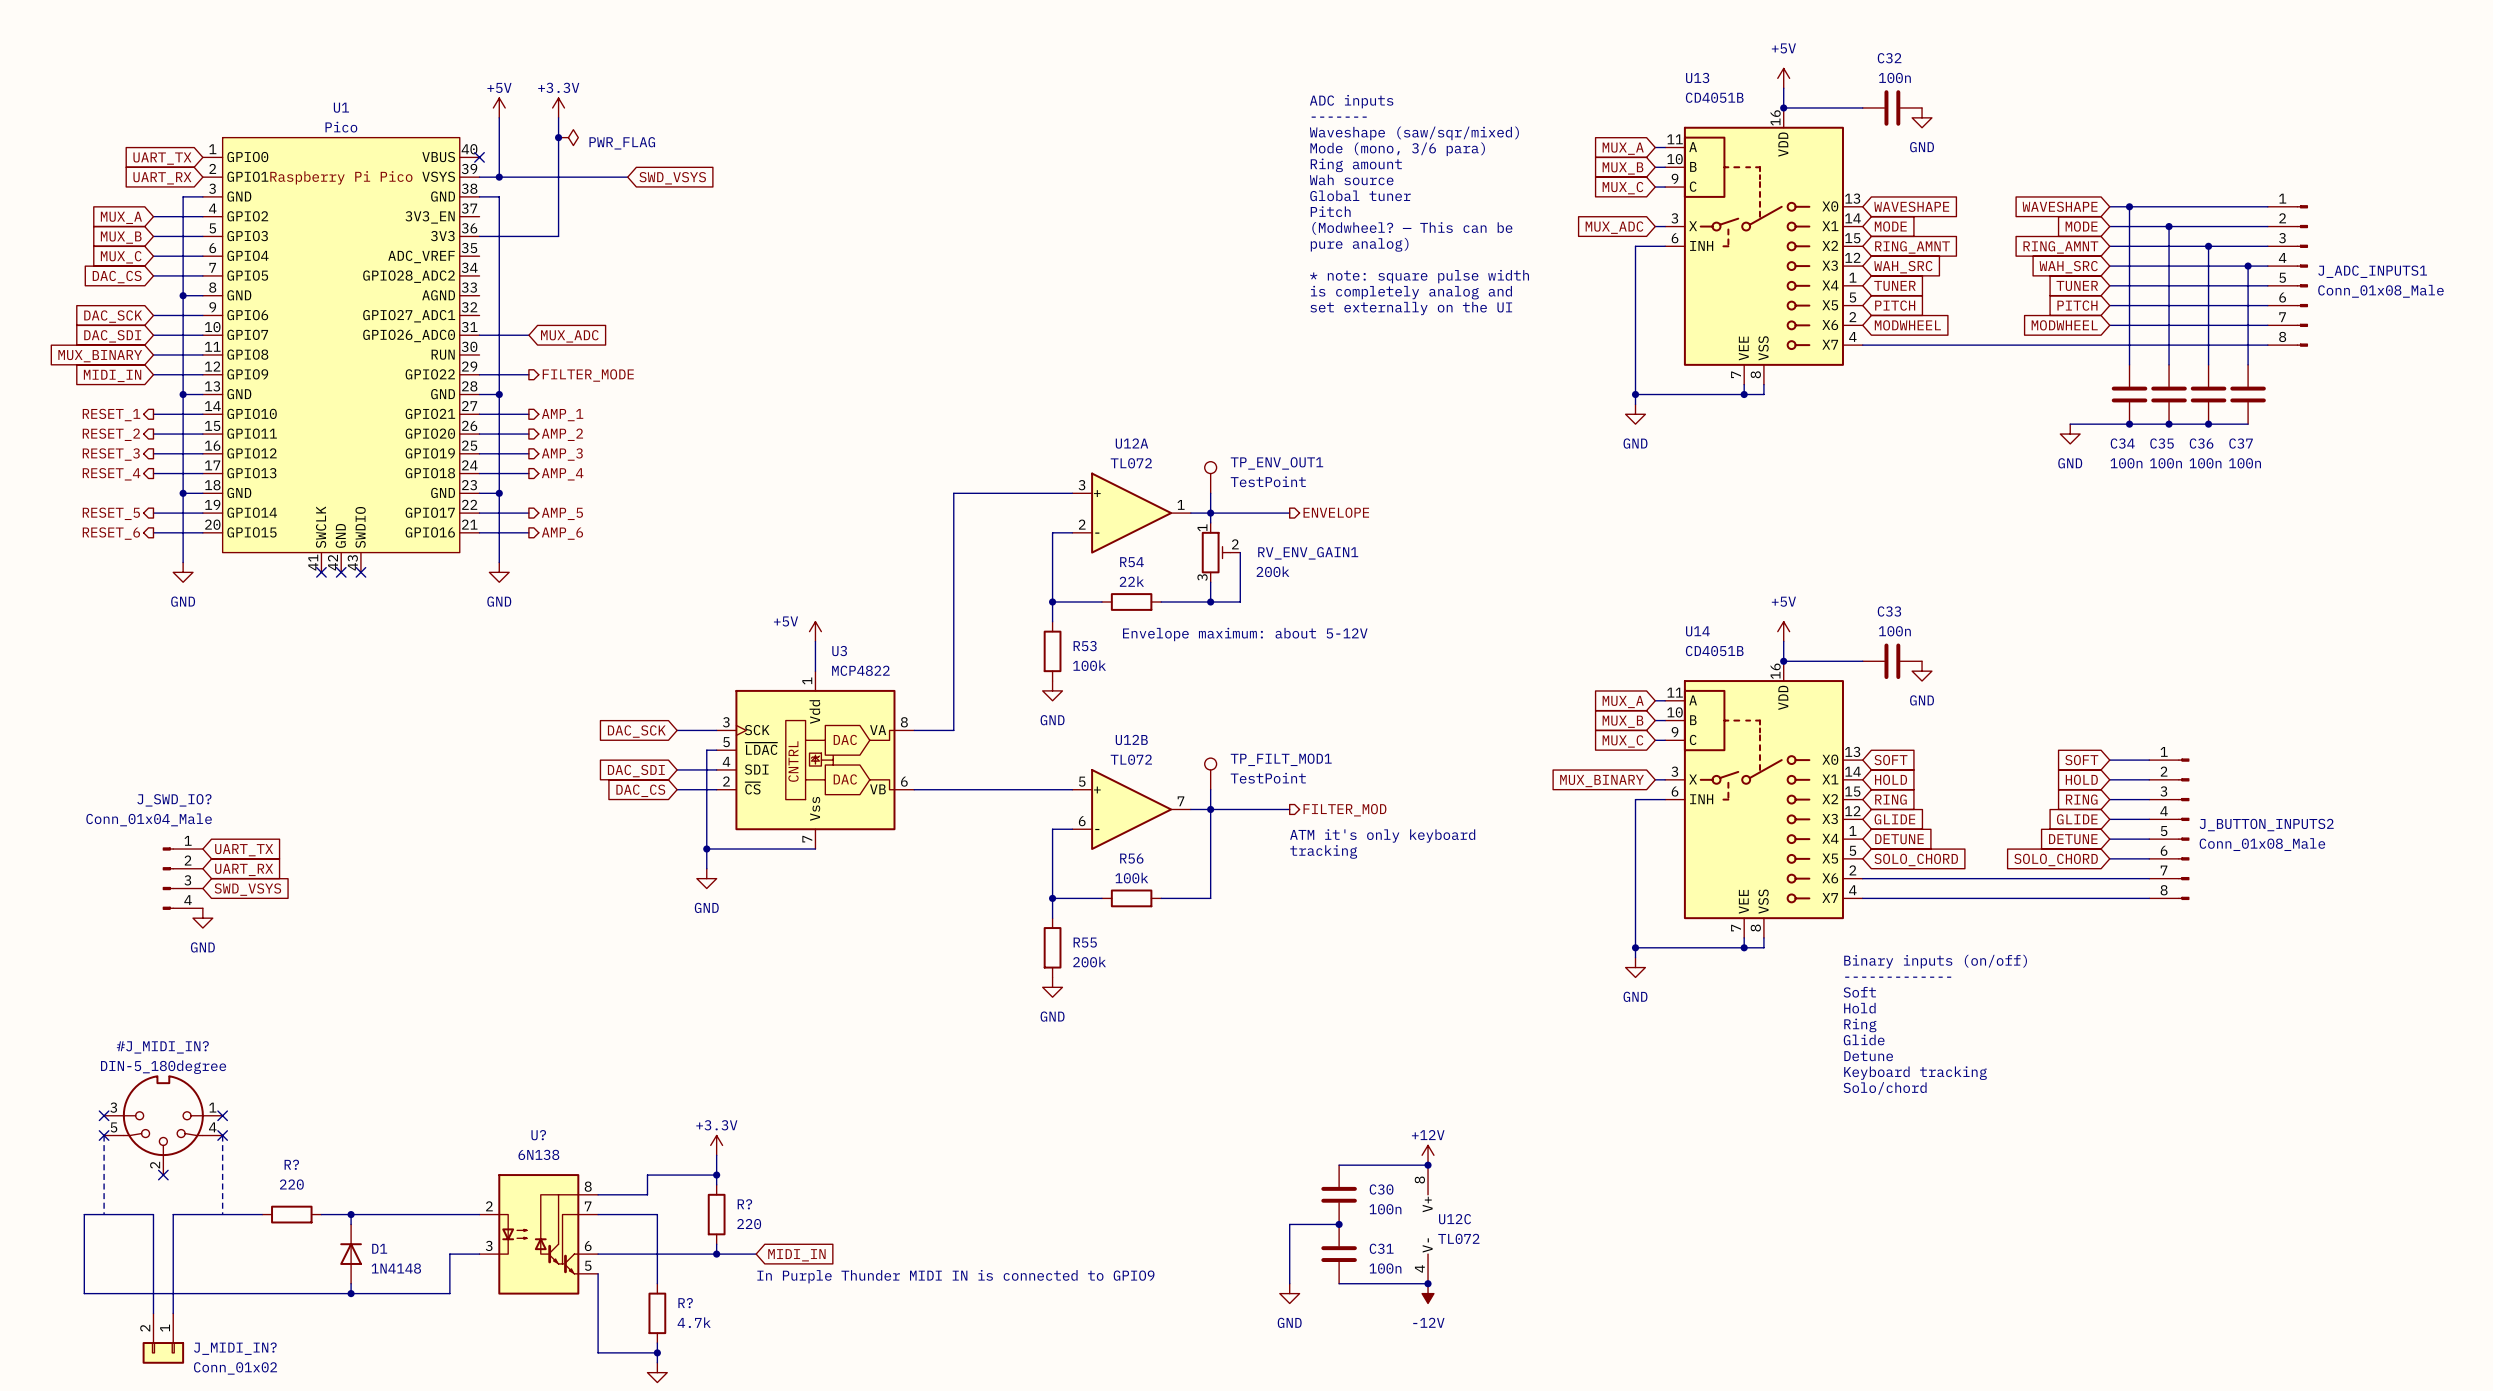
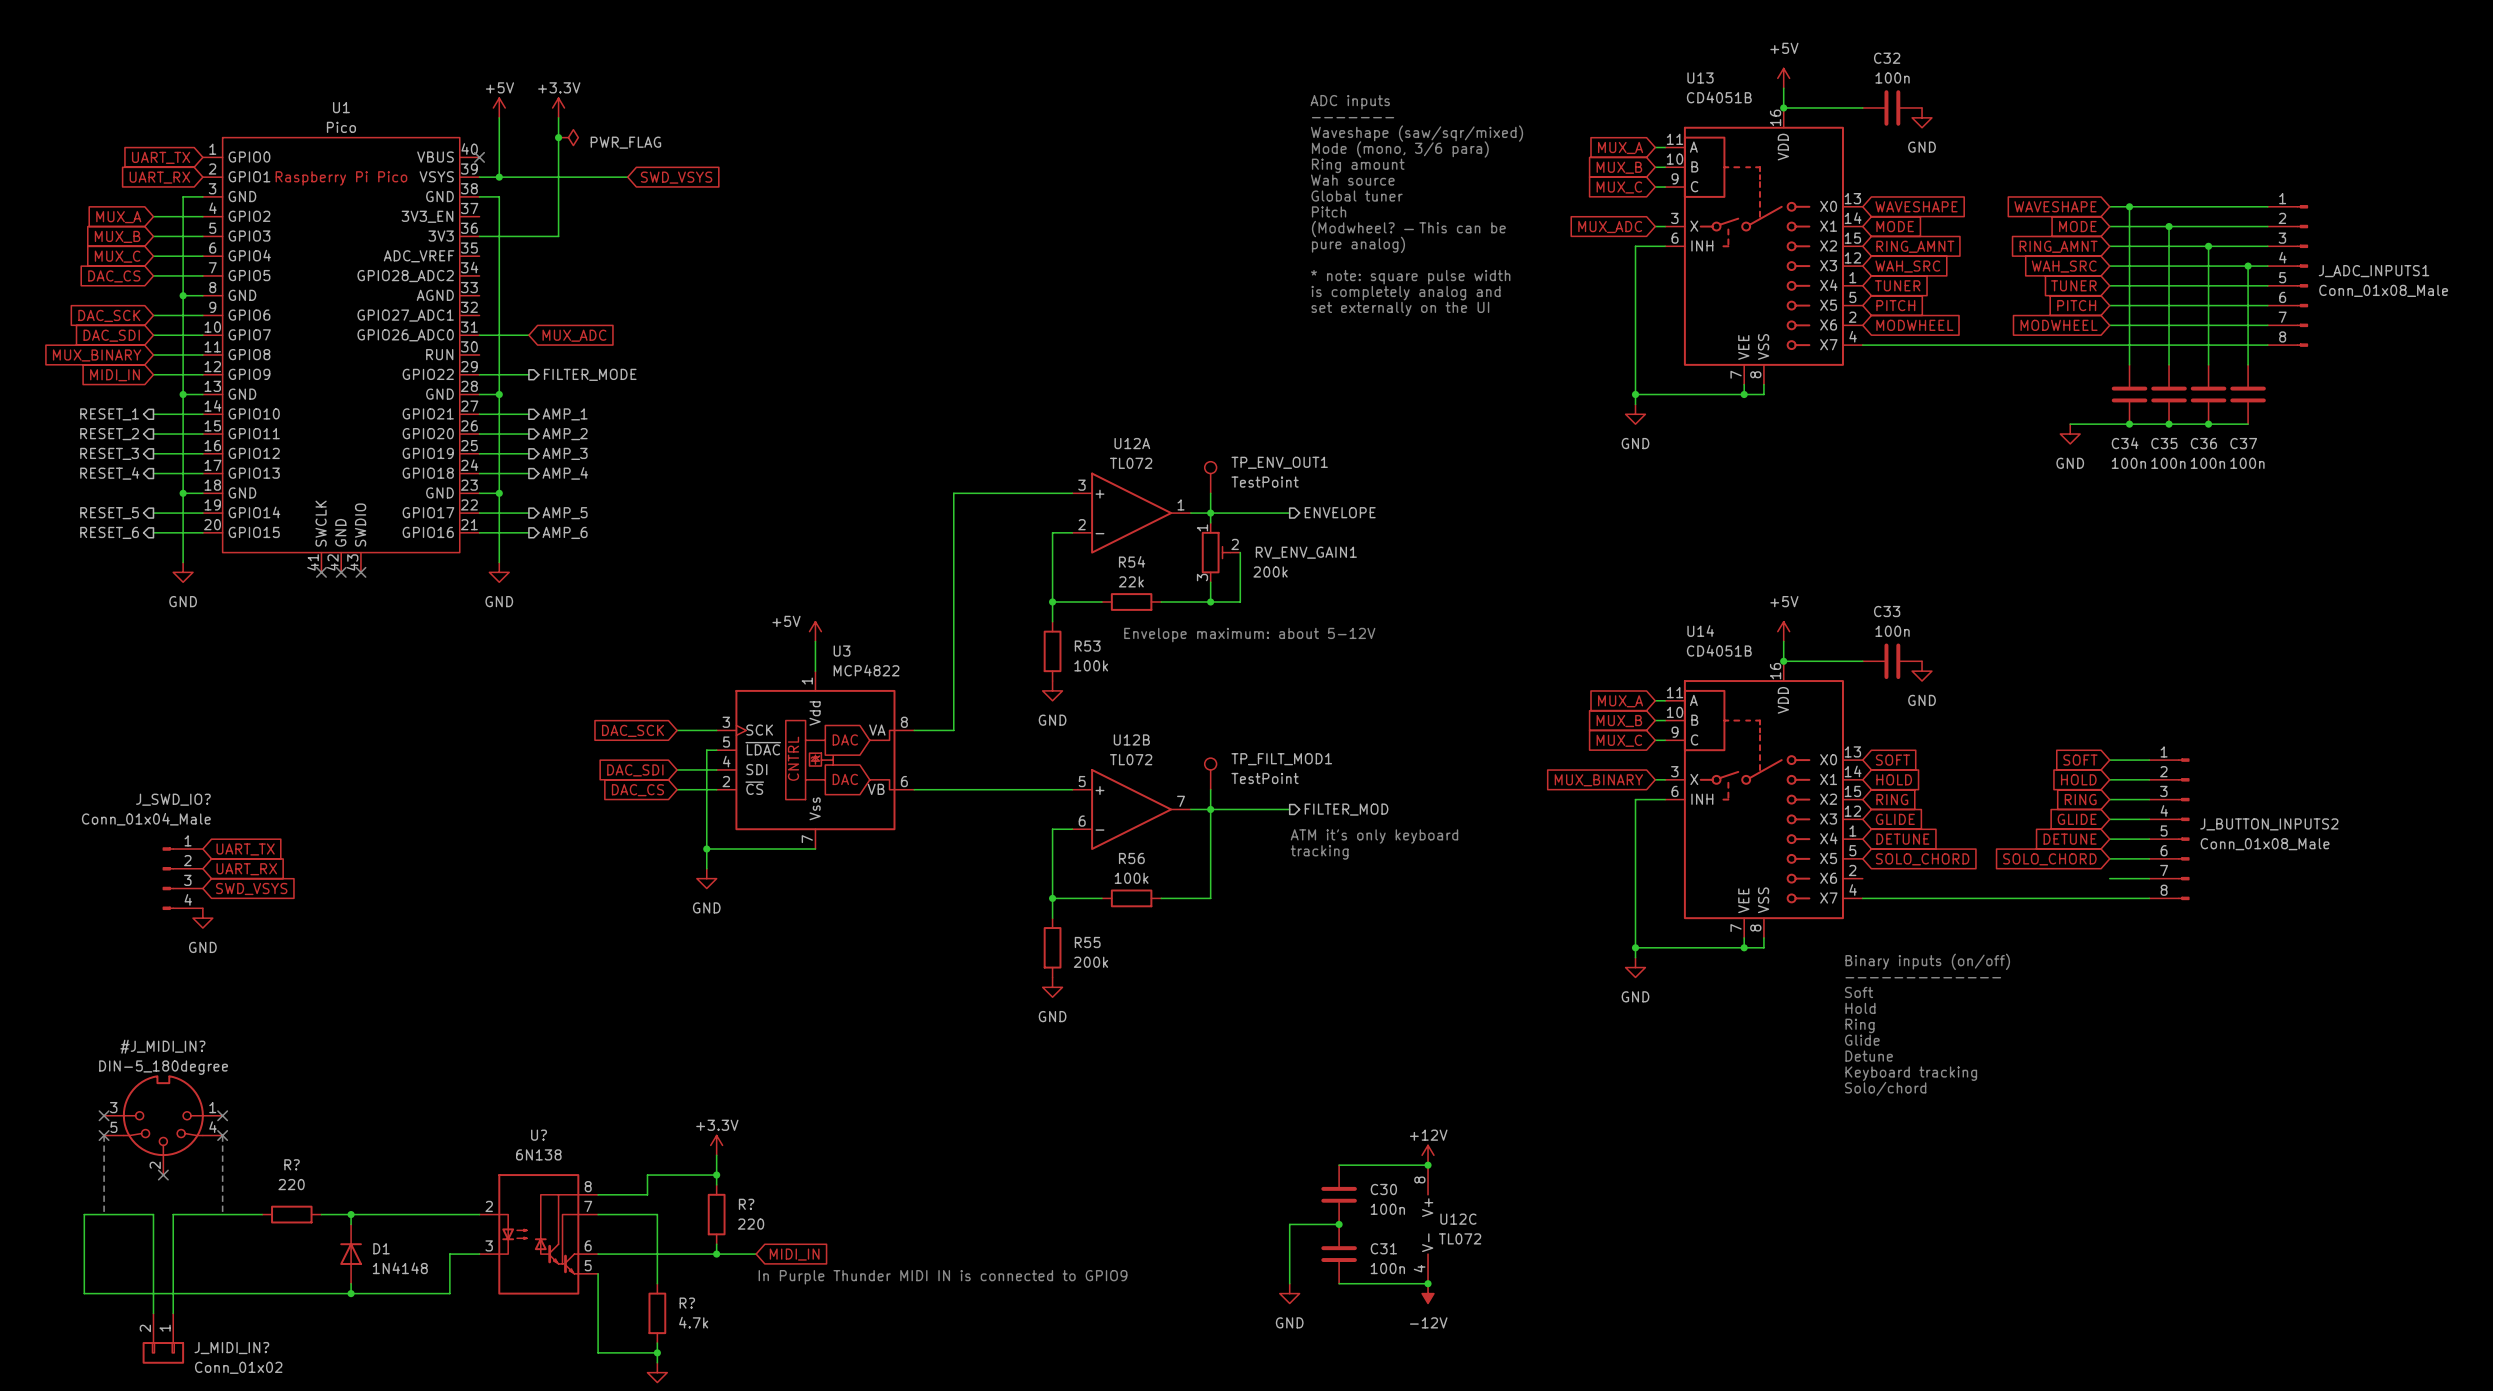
wire: (1862, 878) (2109, 878) -> none

